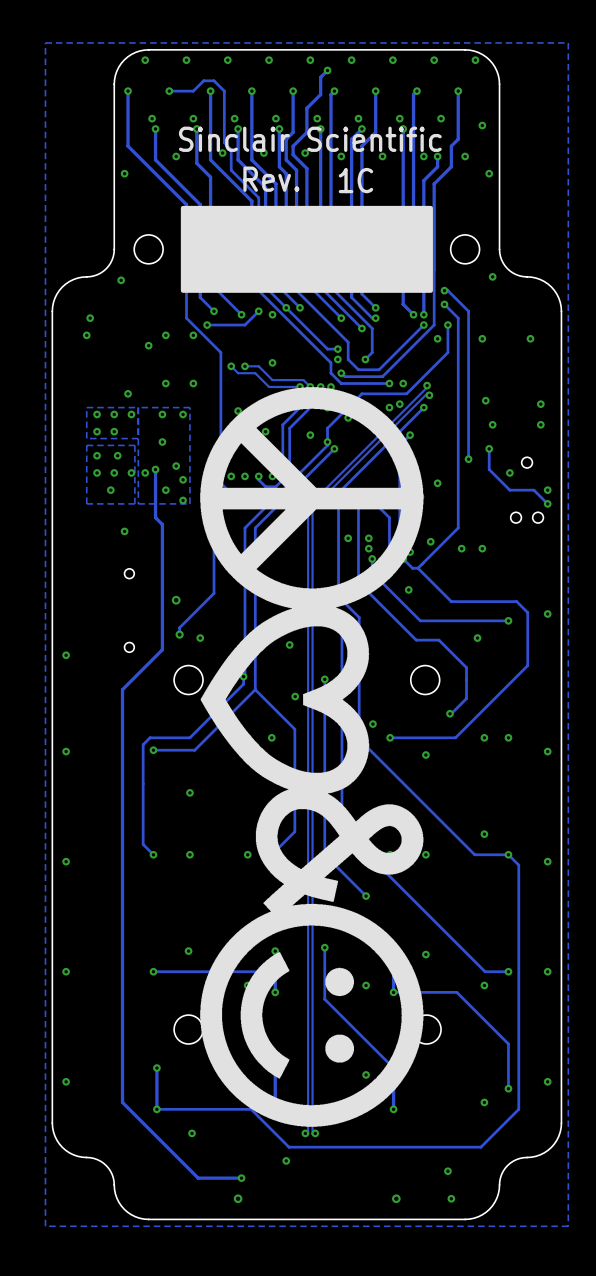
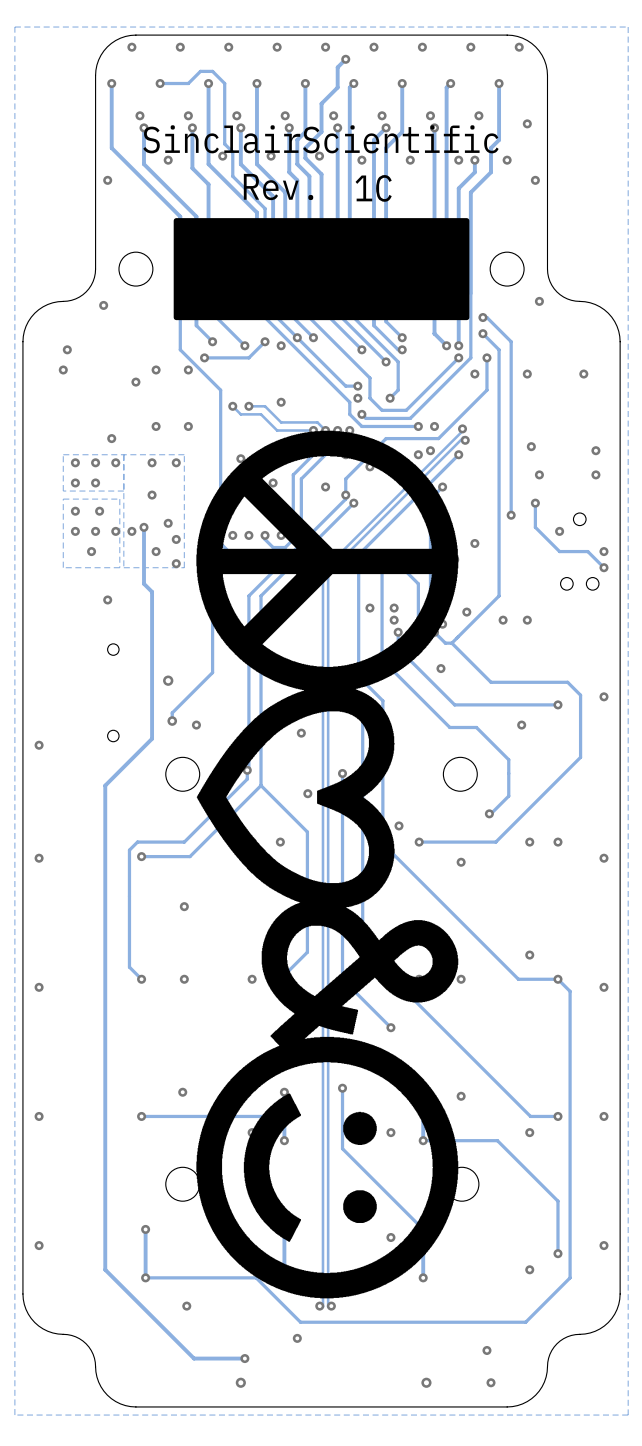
drawing shape: [178, 126, 442, 293] -> [143, 125, 499, 321]

